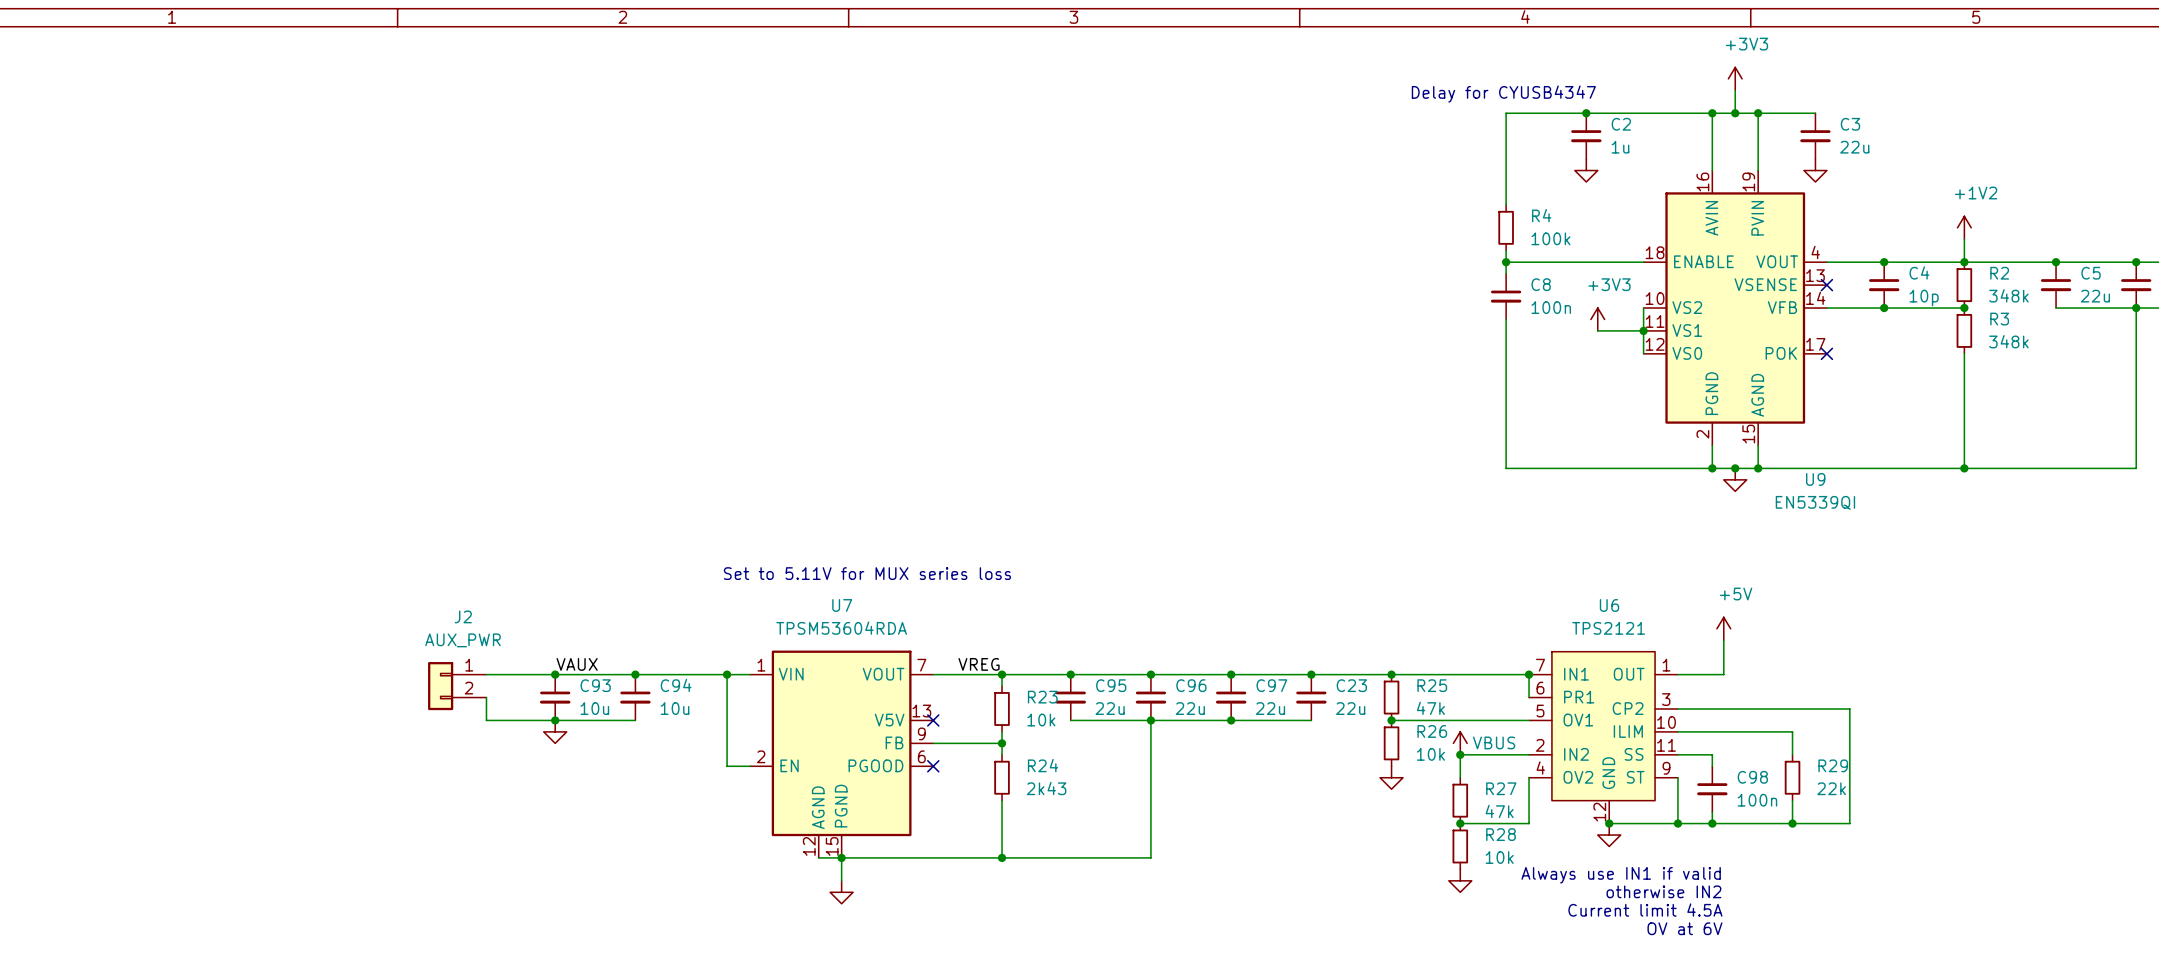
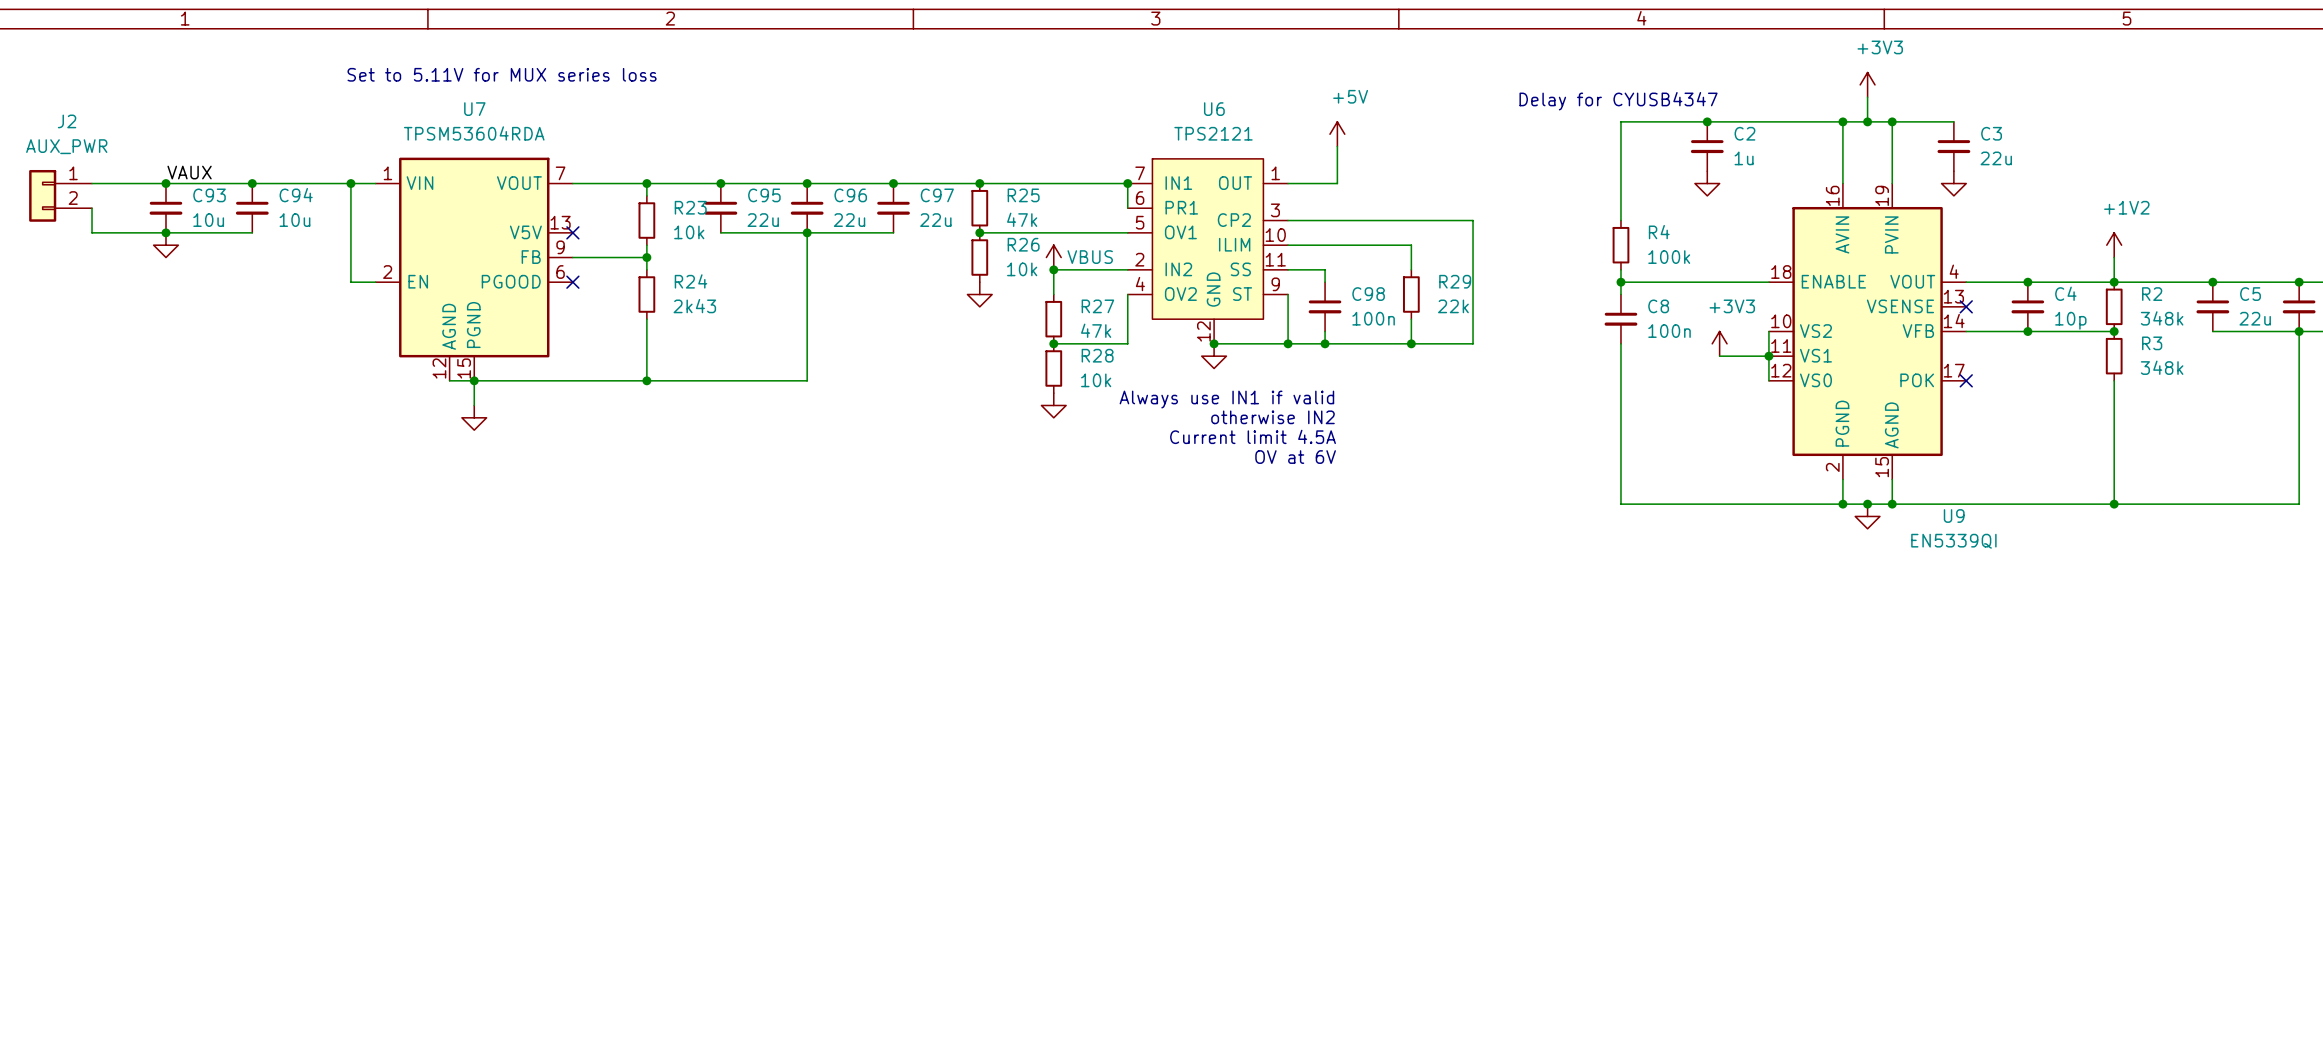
text: none -> Set to 5.11V for MUX series loss (502, 74)
power symbol: none -> +5V (1337, 134)
wire: none -> (1337, 146) (1337, 183) (1288, 183)
label: none -> VAUX (189, 172)
wire: none -> (92, 183) (375, 183)
junction: none -> (165, 183)
junction: none -> (252, 183)
wire: none -> (350, 183) (350, 282) (375, 282)
junction: none -> (350, 183)
wire: none -> (572, 183) (1127, 183) (1127, 208)
wire: none -> (646, 183) (646, 195)
junction: none -> (646, 183)
junction: none -> (720, 183)
junction: none -> (807, 183)
junction: none -> (893, 183)
junction: none -> (979, 183)
junction: none -> (1127, 183)
wire: none -> (92, 208) (92, 232) (252, 232)
wire: none -> (1288, 220) (1473, 220) (1473, 343) (1214, 343)
junction: none -> (165, 232)
no-connect mark: none -> (572, 232)
wire: none -> (720, 232) (893, 232)
wire: none -> (807, 232) (807, 380) (449, 380)
junction: none -> (807, 232)
wire: none -> (979, 232) (1127, 232)
junction: none -> (979, 232)
power symbol: none -> (165, 245)
wire: none -> (646, 245) (646, 269)
wire: none -> (1288, 245) (1411, 245) (1411, 269)
wire: none -> (572, 257) (646, 257)
junction: none -> (646, 257)
power symbol: none -> VBUS (1053, 257)
junction: none -> (1053, 269)
wire: none -> (1127, 269) (1053, 269) (1053, 294)
wire: none -> (1288, 269) (1325, 269) (1325, 282)
no-connect mark: none -> (572, 282)
power symbol: none -> (979, 294)
wire: none -> (1127, 294) (1127, 343) (1053, 343)
wire: none -> (1288, 294) (1288, 343)
wire: none -> (646, 319) (646, 380)
wire: none -> (1411, 319) (1411, 343)
wire: none -> (1325, 331) (1325, 343)
junction: none -> (1053, 343)
junction: none -> (1214, 343)
junction: none -> (1288, 343)
junction: none -> (1325, 343)
junction: none -> (1411, 343)
power symbol: none -> (1214, 356)
wire: none -> (474, 380) (474, 405)
junction: none -> (474, 380)
junction: none -> (646, 380)
text: none -> Always use IN1 if valid (1226, 399)
power symbol: none -> (1053, 405)
text: none -> otherwise IN2 (1272, 417)
power symbol: none -> (474, 417)
text: none -> Current limit 4.5A (1253, 436)
text: none -> OV at 6V (1295, 457)
text: Set to 5.11V for MUX series loss (867, 573) -> none
power symbol: +5V (1723, 628) -> none
wire: (1723, 640) (1723, 674) (1677, 674) -> none
label: VAUX (577, 664) -> none
label: VREG (979, 664) -> none
wire: (486, 674) (749, 674) -> none
junction: (555, 674) -> none
junction: (635, 674) -> none
wire: (727, 674) (727, 766) (749, 766) -> none
junction: (727, 674) -> none
wire: (933, 674) (1529, 674) (1529, 697) -> none
wire: (1002, 674) (1002, 686) -> none
junction: (1002, 674) -> none
junction: (1070, 674) -> none
junction: (1150, 674) -> none
junction: (1231, 674) -> none
junction: (1311, 674) -> none
junction: (1391, 674) -> none
junction: (1529, 674) -> none
J2 position: (457, 686) -> (60, 195)
wire: (486, 697) (486, 720) (635, 720) -> none
C93 position: (555, 697) -> (165, 208)
C94 position: (635, 697) -> (252, 208)
C95 position: (1070, 697) -> (720, 208)
C96 position: (1150, 697) -> (807, 208)
C97 position: (1231, 697) -> (893, 208)
C23: 22u (1311, 697) -> none
R25 position: (1391, 697) -> (979, 208)
R23 position: (1002, 709) -> (646, 220)
wire: (1677, 709) (1849, 709) (1849, 823) (1609, 823) -> none
junction: (555, 720) -> none
no-connect mark: (933, 720) -> none
wire: (1070, 720) (1311, 720) -> none
wire: (1150, 720) (1150, 857) (818, 857) -> none
junction: (1150, 720) -> none
junction: (1231, 720) -> none
wire: (1391, 720) (1529, 720) -> none
junction: (1391, 720) -> none
power symbol: (555, 731) -> none
wire: (1002, 731) (1002, 754) -> none
wire: (1677, 731) (1792, 731) (1792, 754) -> none
U6 position: (1603, 737) -> (1207, 251)
wire: (933, 743) (1002, 743) -> none
junction: (1002, 743) -> none
R26 position: (1391, 743) -> (979, 257)
power symbol: VBUS (1460, 743) -> none
U7 position: (841, 754) -> (474, 269)
junction: (1460, 754) -> none
wire: (1529, 754) (1460, 754) (1460, 777) -> none
wire: (1677, 754) (1712, 754) (1712, 766) -> none
no-connect mark: (933, 766) -> none
R24 position: (1002, 777) -> (646, 294)
power symbol: (1391, 777) -> none
wire: (1529, 777) (1529, 823) (1460, 823) -> none
wire: (1677, 777) (1677, 823) -> none
R29 position: (1792, 777) -> (1411, 294)
C98 position: (1712, 789) -> (1325, 306)
wire: (1002, 800) (1002, 857) -> none
R27 position: (1460, 800) -> (1053, 319)
wire: (1792, 800) (1792, 823) -> none
wire: (1712, 812) (1712, 823) -> none
junction: (1460, 823) -> none
junction: (1609, 823) -> none
junction: (1677, 823) -> none
junction: (1712, 823) -> none
junction: (1792, 823) -> none
power symbol: (1609, 835) -> none
R28 position: (1460, 846) -> (1053, 368)
wire: (841, 857) (841, 880) -> none
junction: (841, 857) -> none
junction: (1002, 857) -> none
text: Always use IN1 if valid (1621, 875) -> none
power symbol: (1460, 880) -> none
text: otherwise IN2 (1663, 891) -> none
power symbol: (841, 892) -> none
text: Current limit 4.5A (1645, 910) -> none
text: OV at 6V (1684, 928) -> none

